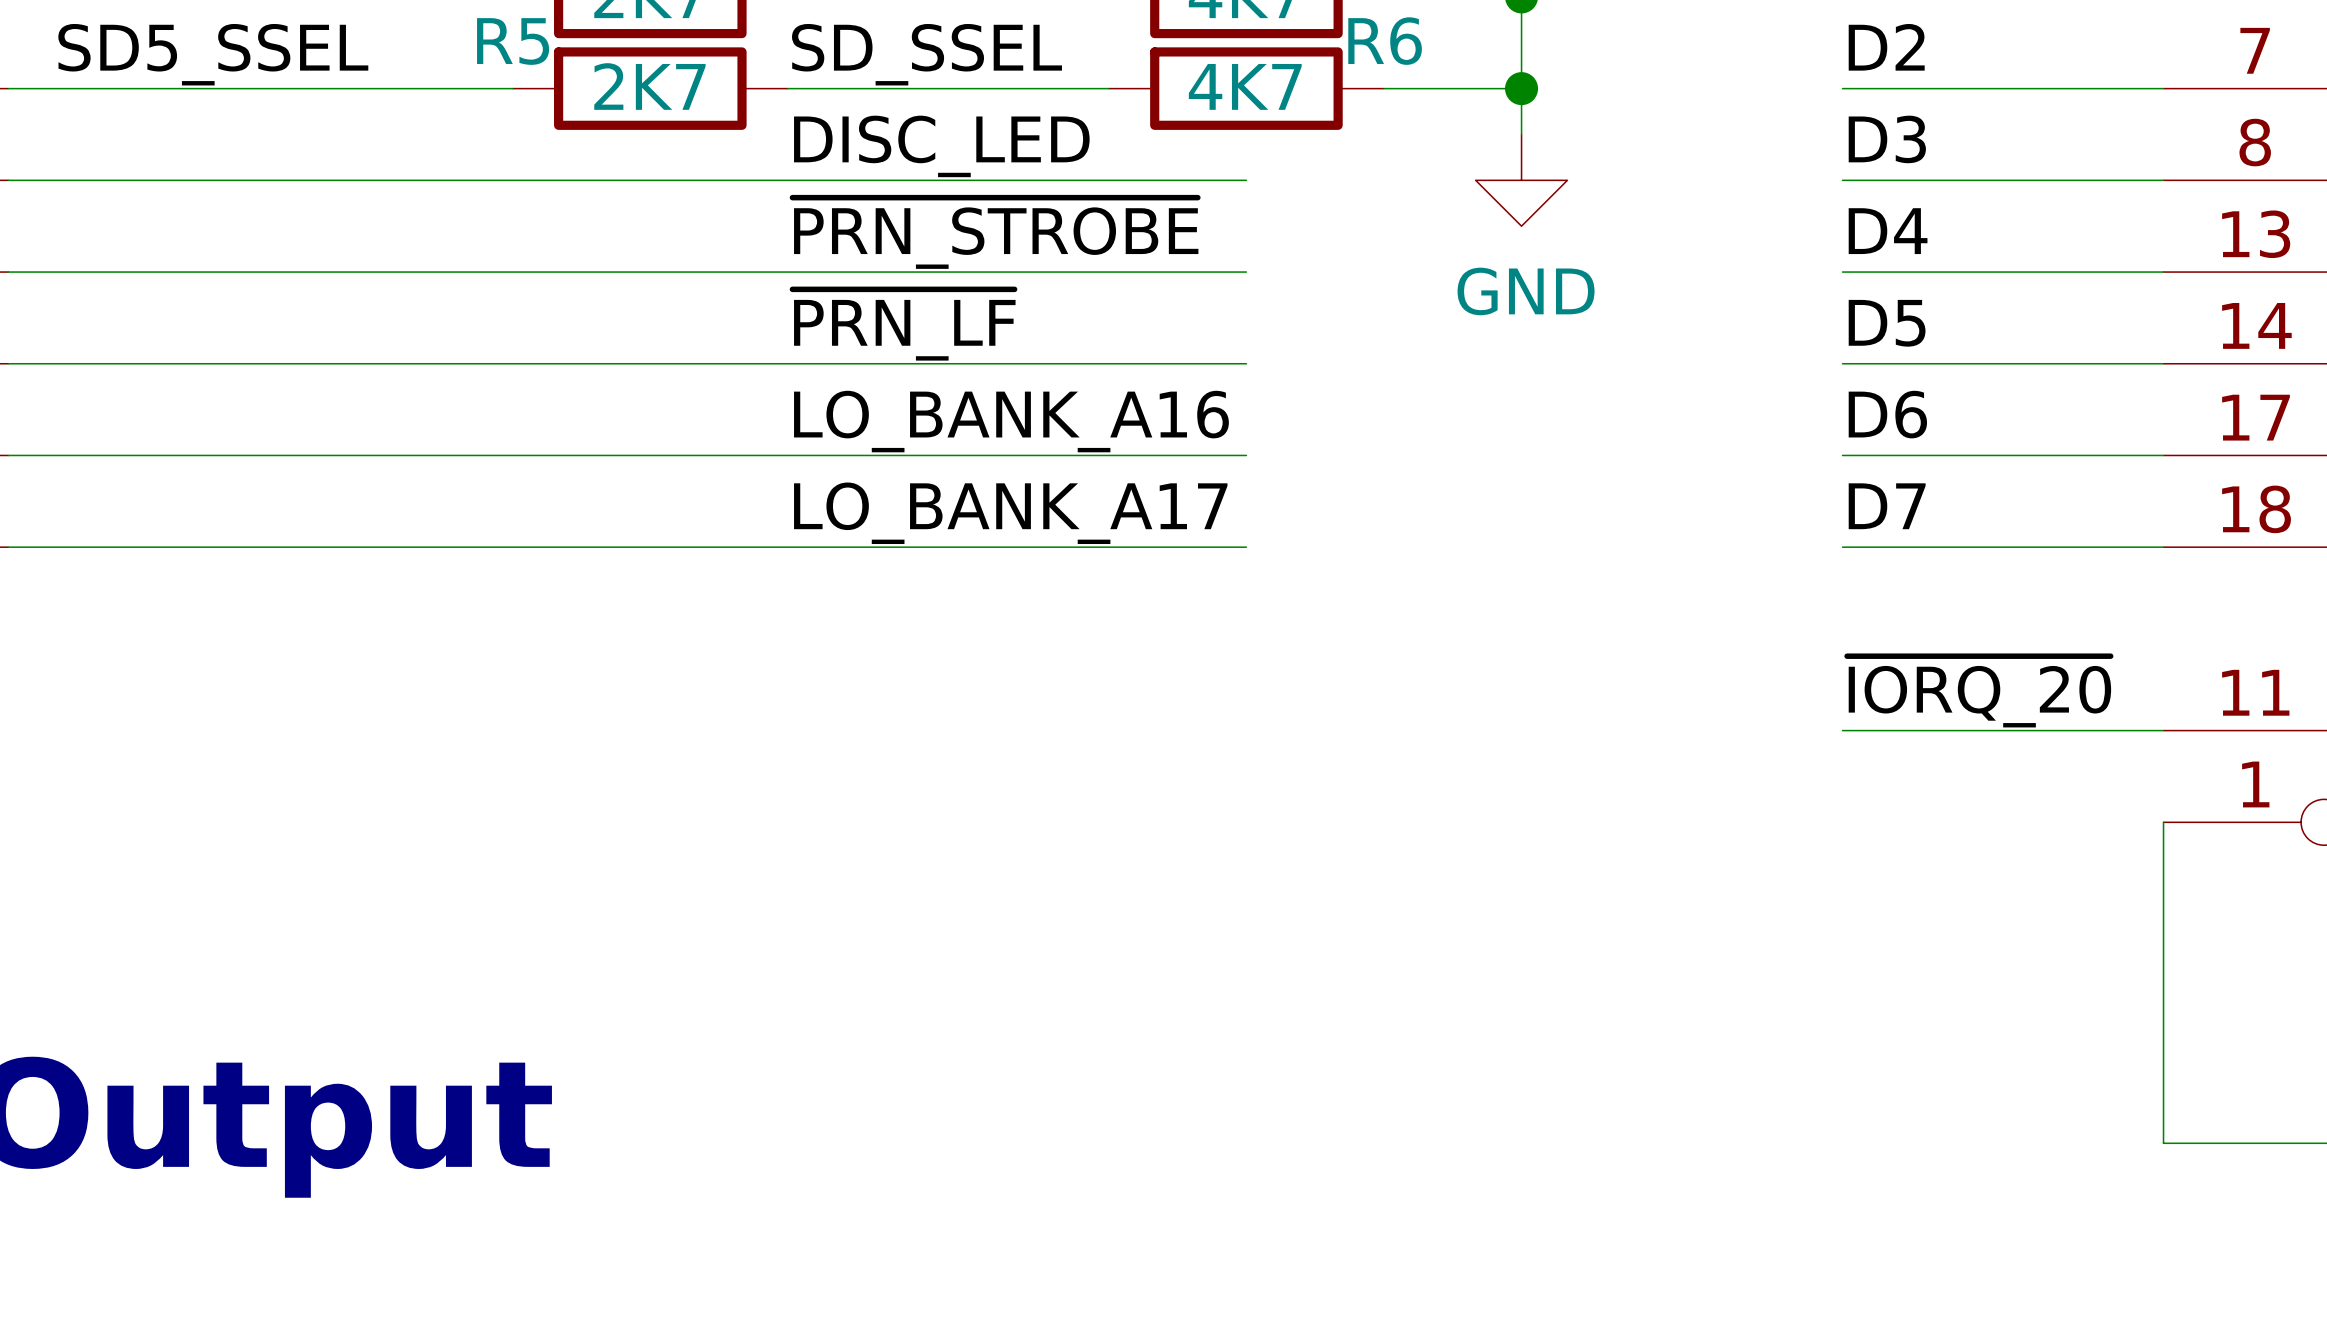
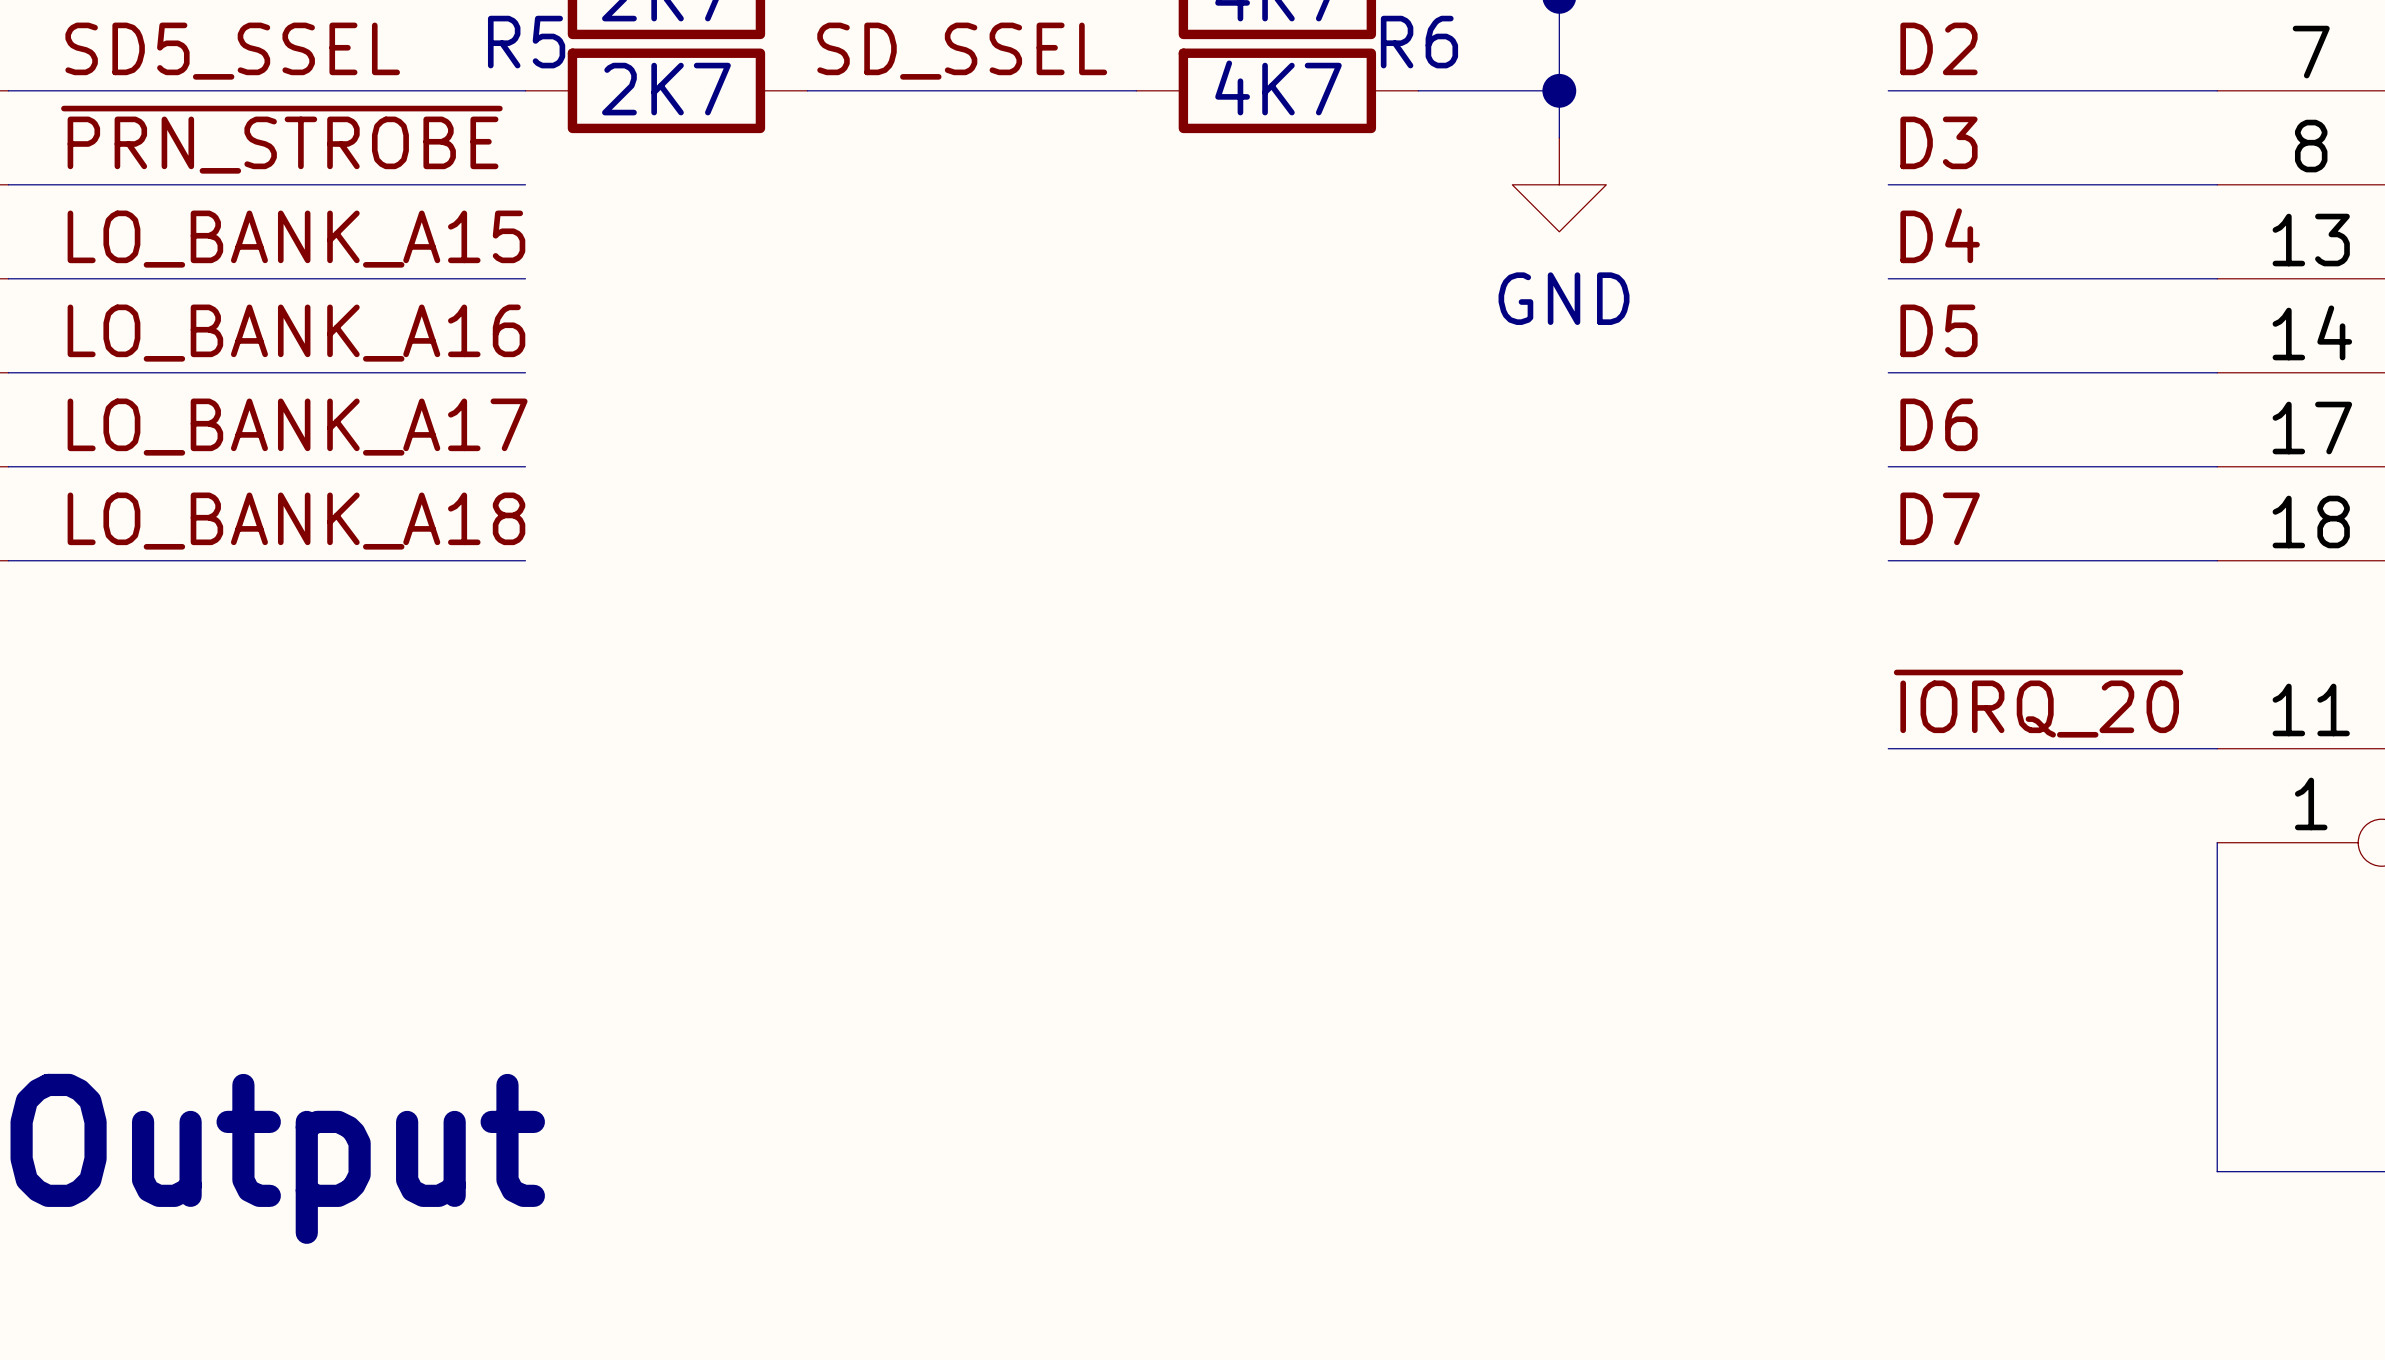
label: DISC_LED (941, 146) -> none
wire: (512, 180) (1246, 180) -> none
label position: ~{PRN_STROBE} (995, 233) -> ~{PRN_STROBE} (281, 139)
label: none -> LO_BANK_A15 (296, 239)
wire: (512, 272) (1246, 272) -> none
label: ~{PRN_LF} (904, 324) -> none
wire: (512, 363) (1246, 363) -> none
label position: LO_BANK_A16 (1011, 421) -> LO_BANK_A16 (296, 333)
wire: (512, 455) (1246, 455) -> none
label: none -> LO_BANK_A18 (296, 521)
label position: LO_BANK_A17 (1010, 513) -> LO_BANK_A17 (297, 427)
wire: (512, 547) (1246, 547) -> none

